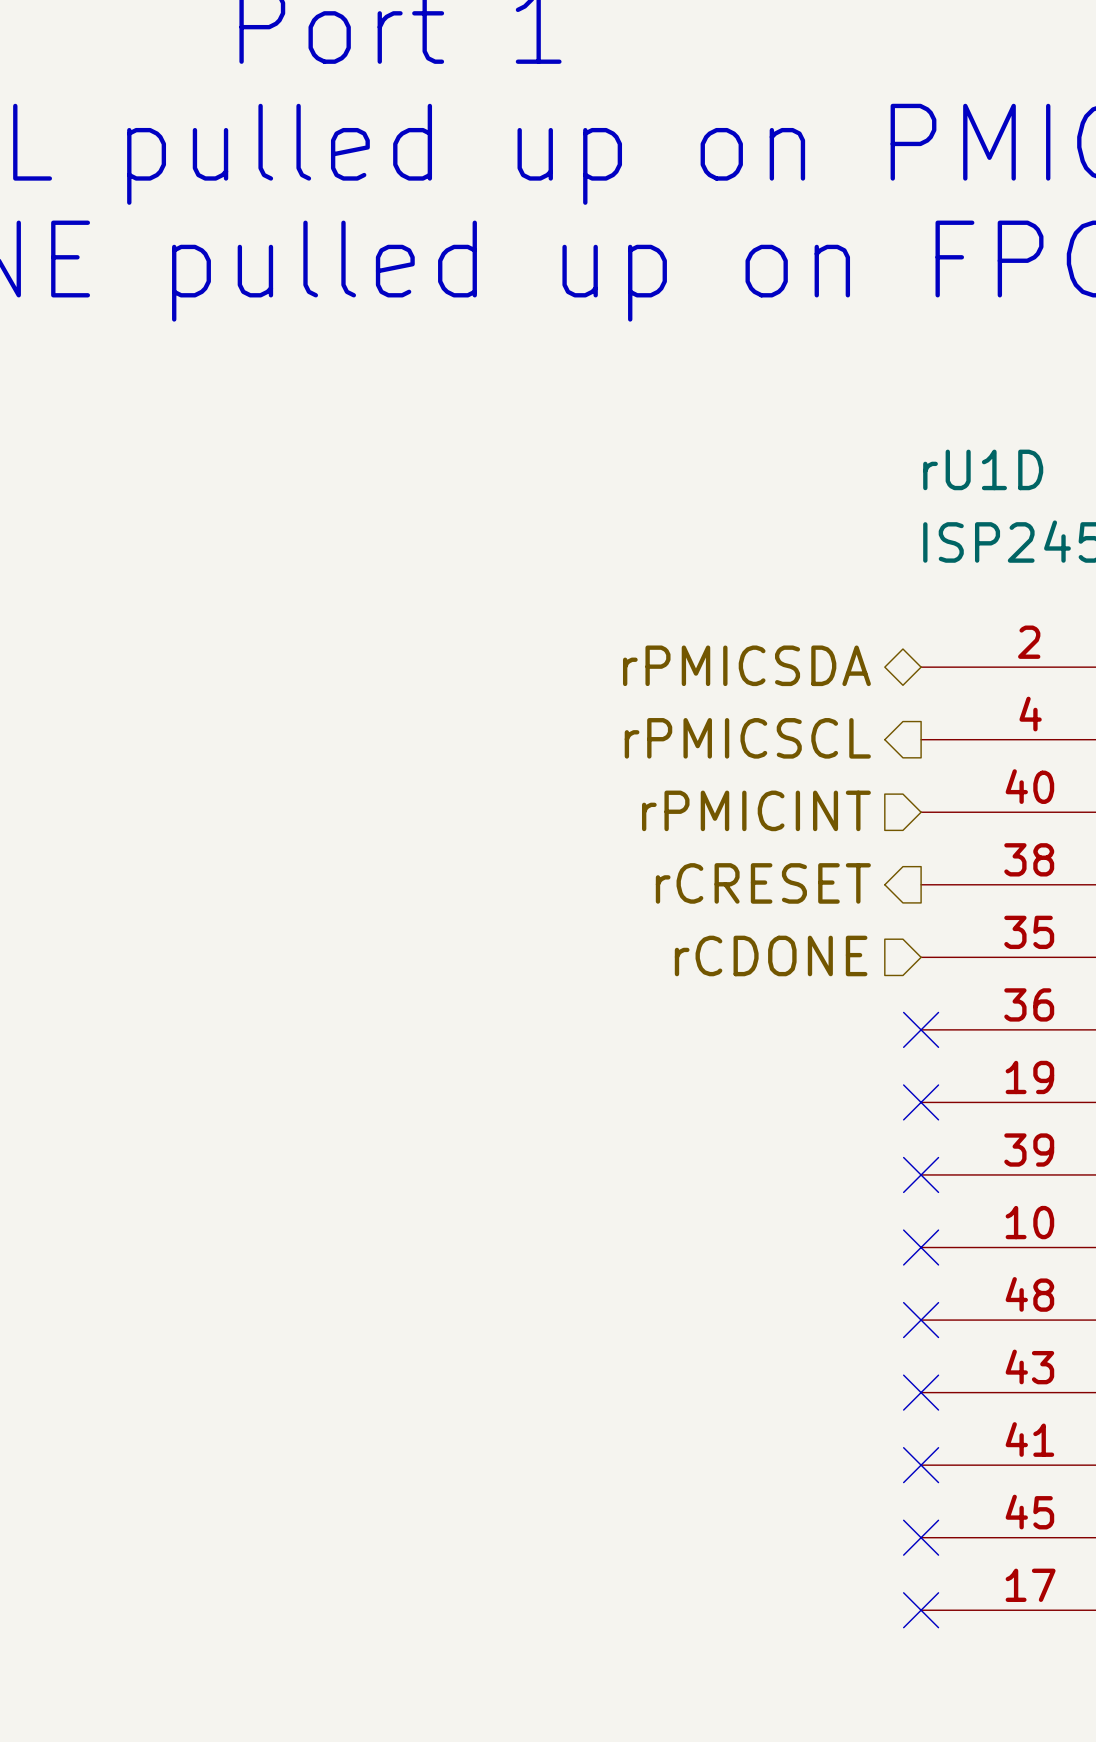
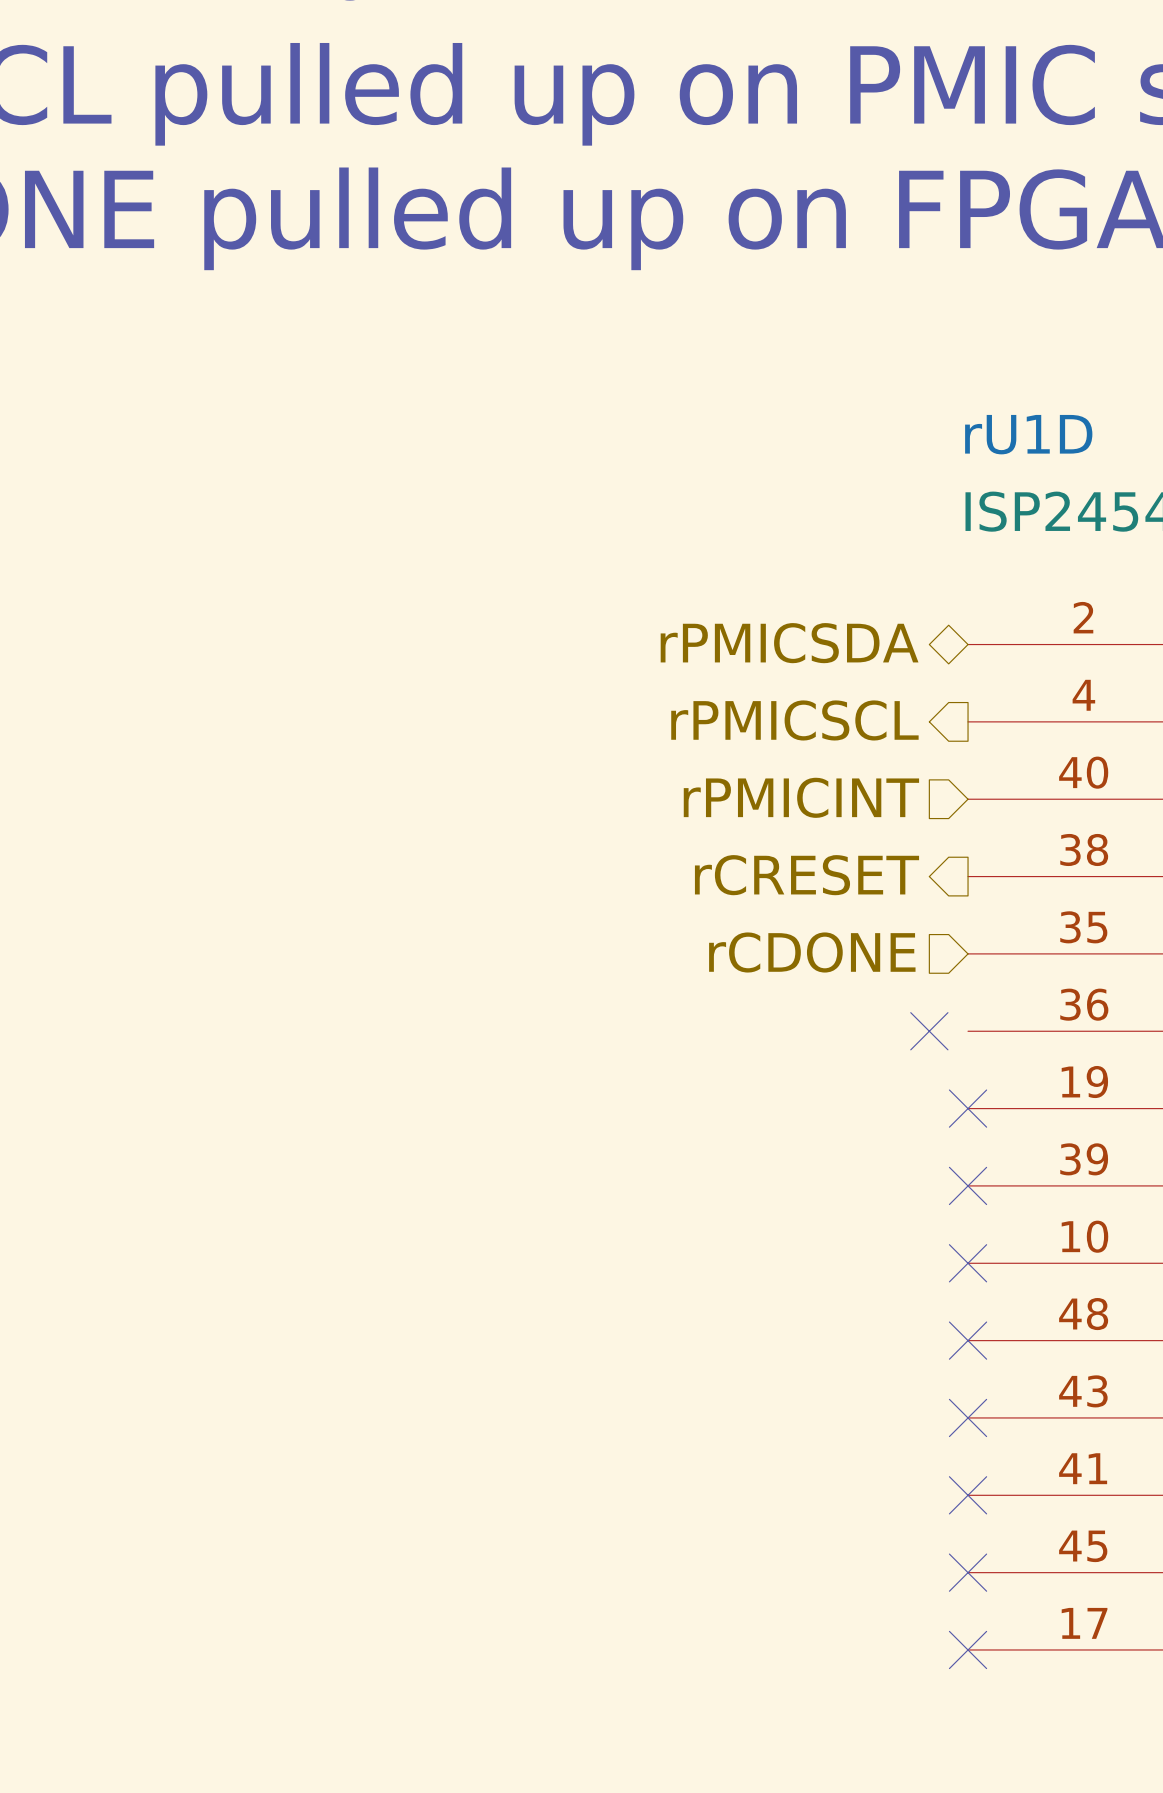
no-connect mark position: (921, 1029) -> (929, 1031)

